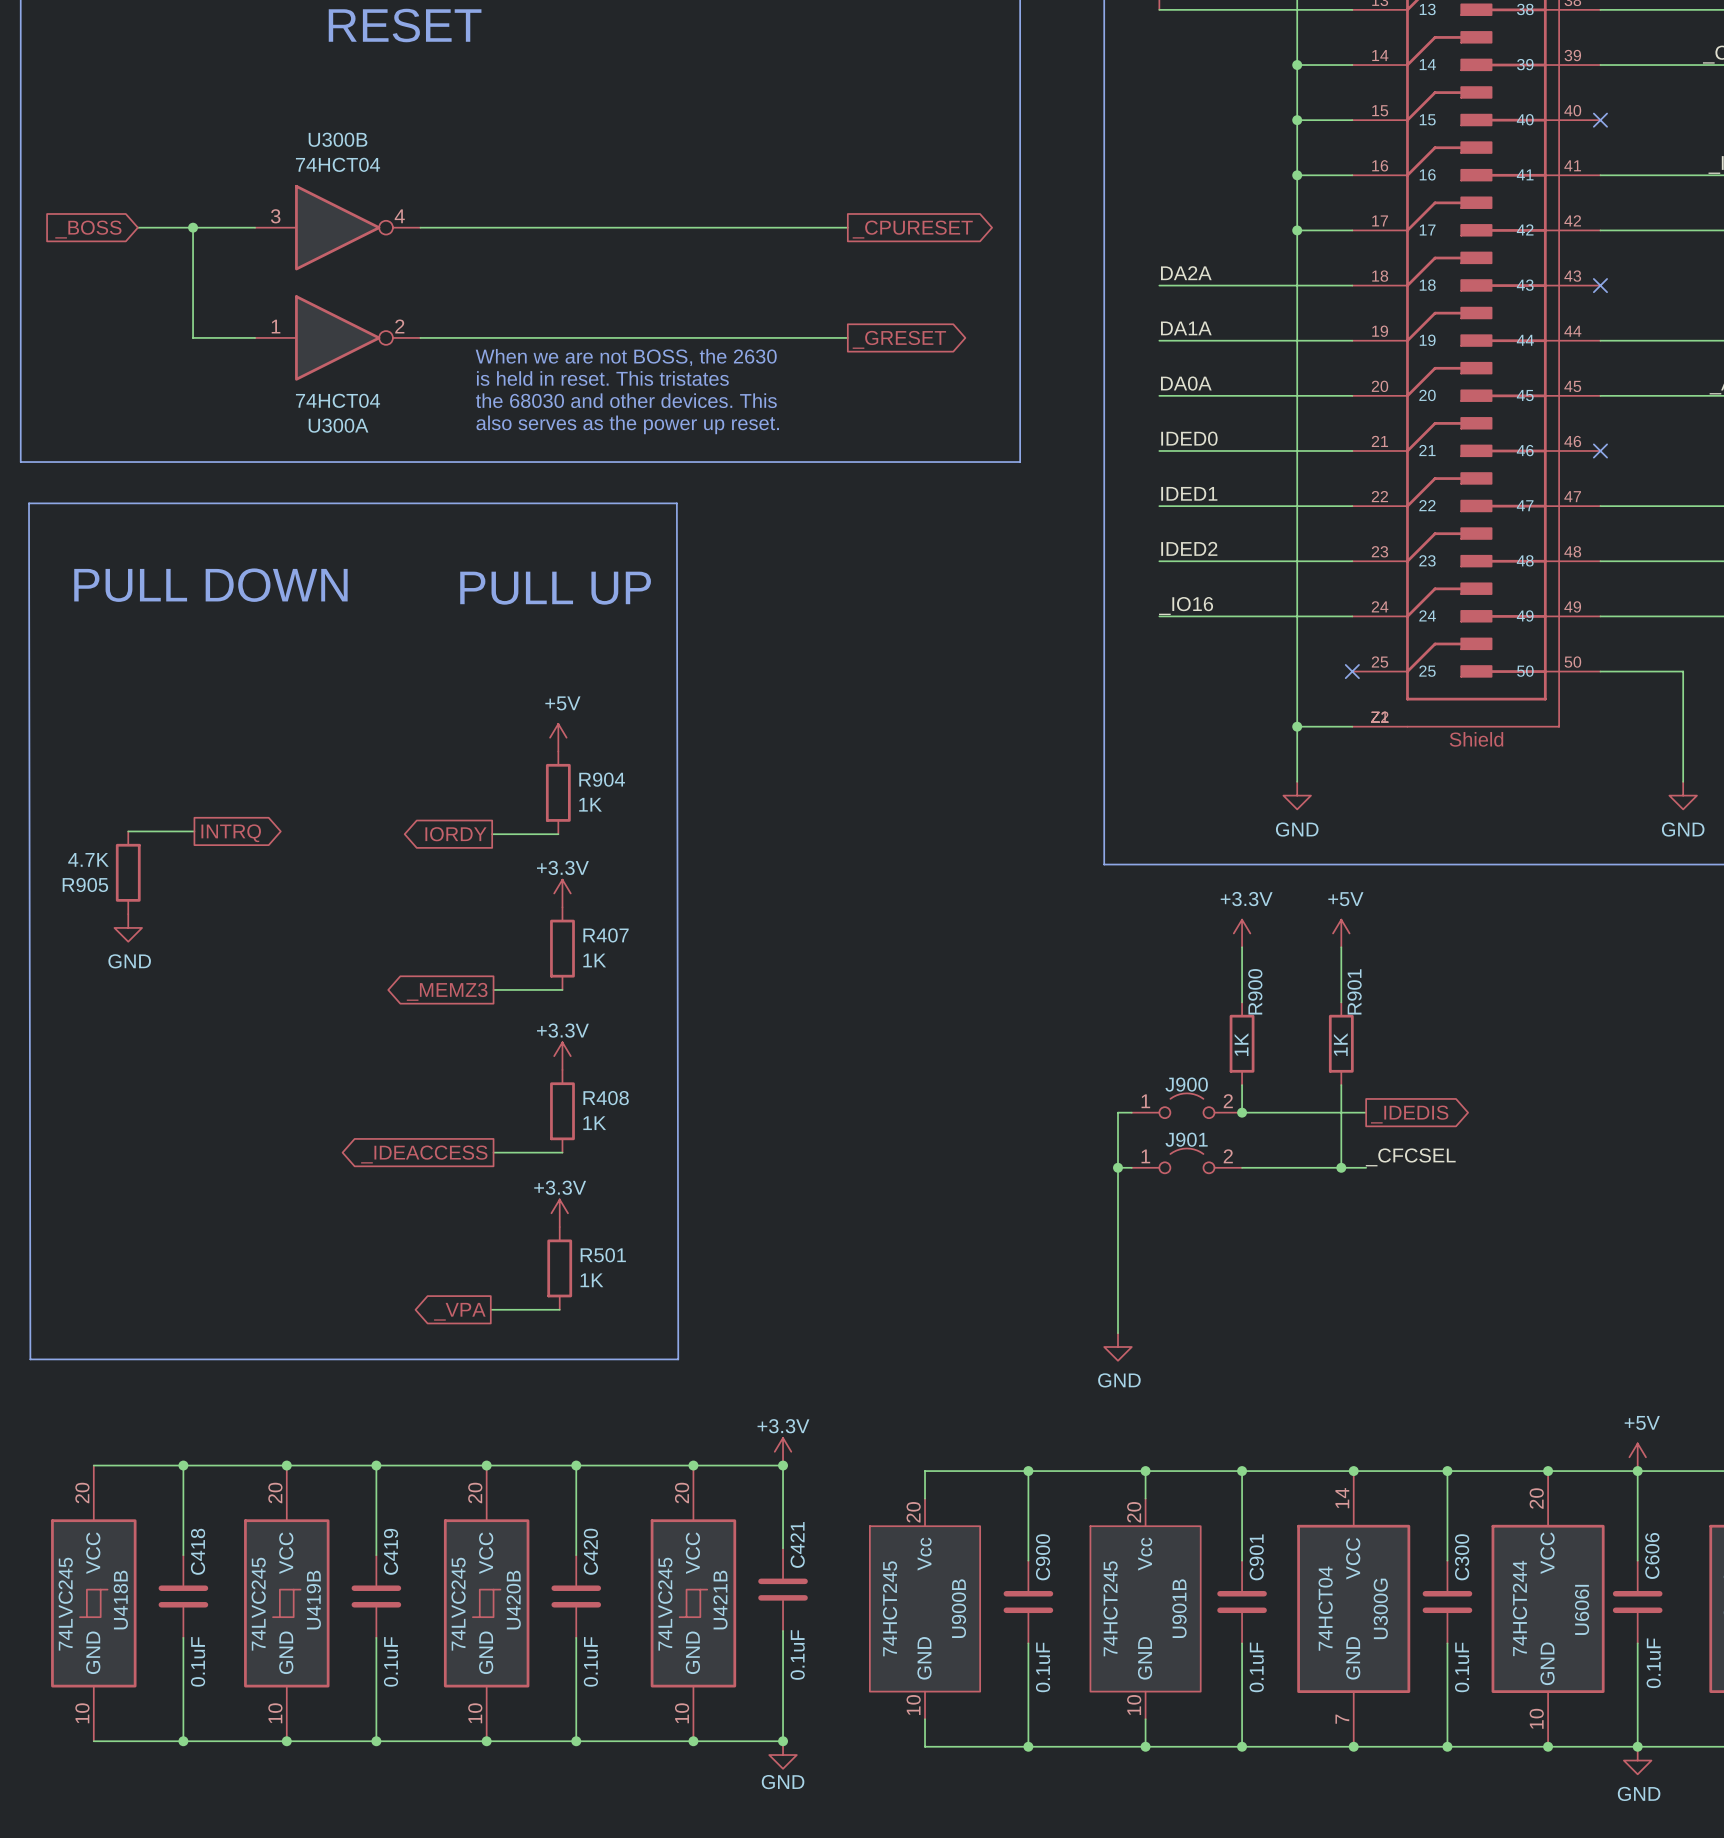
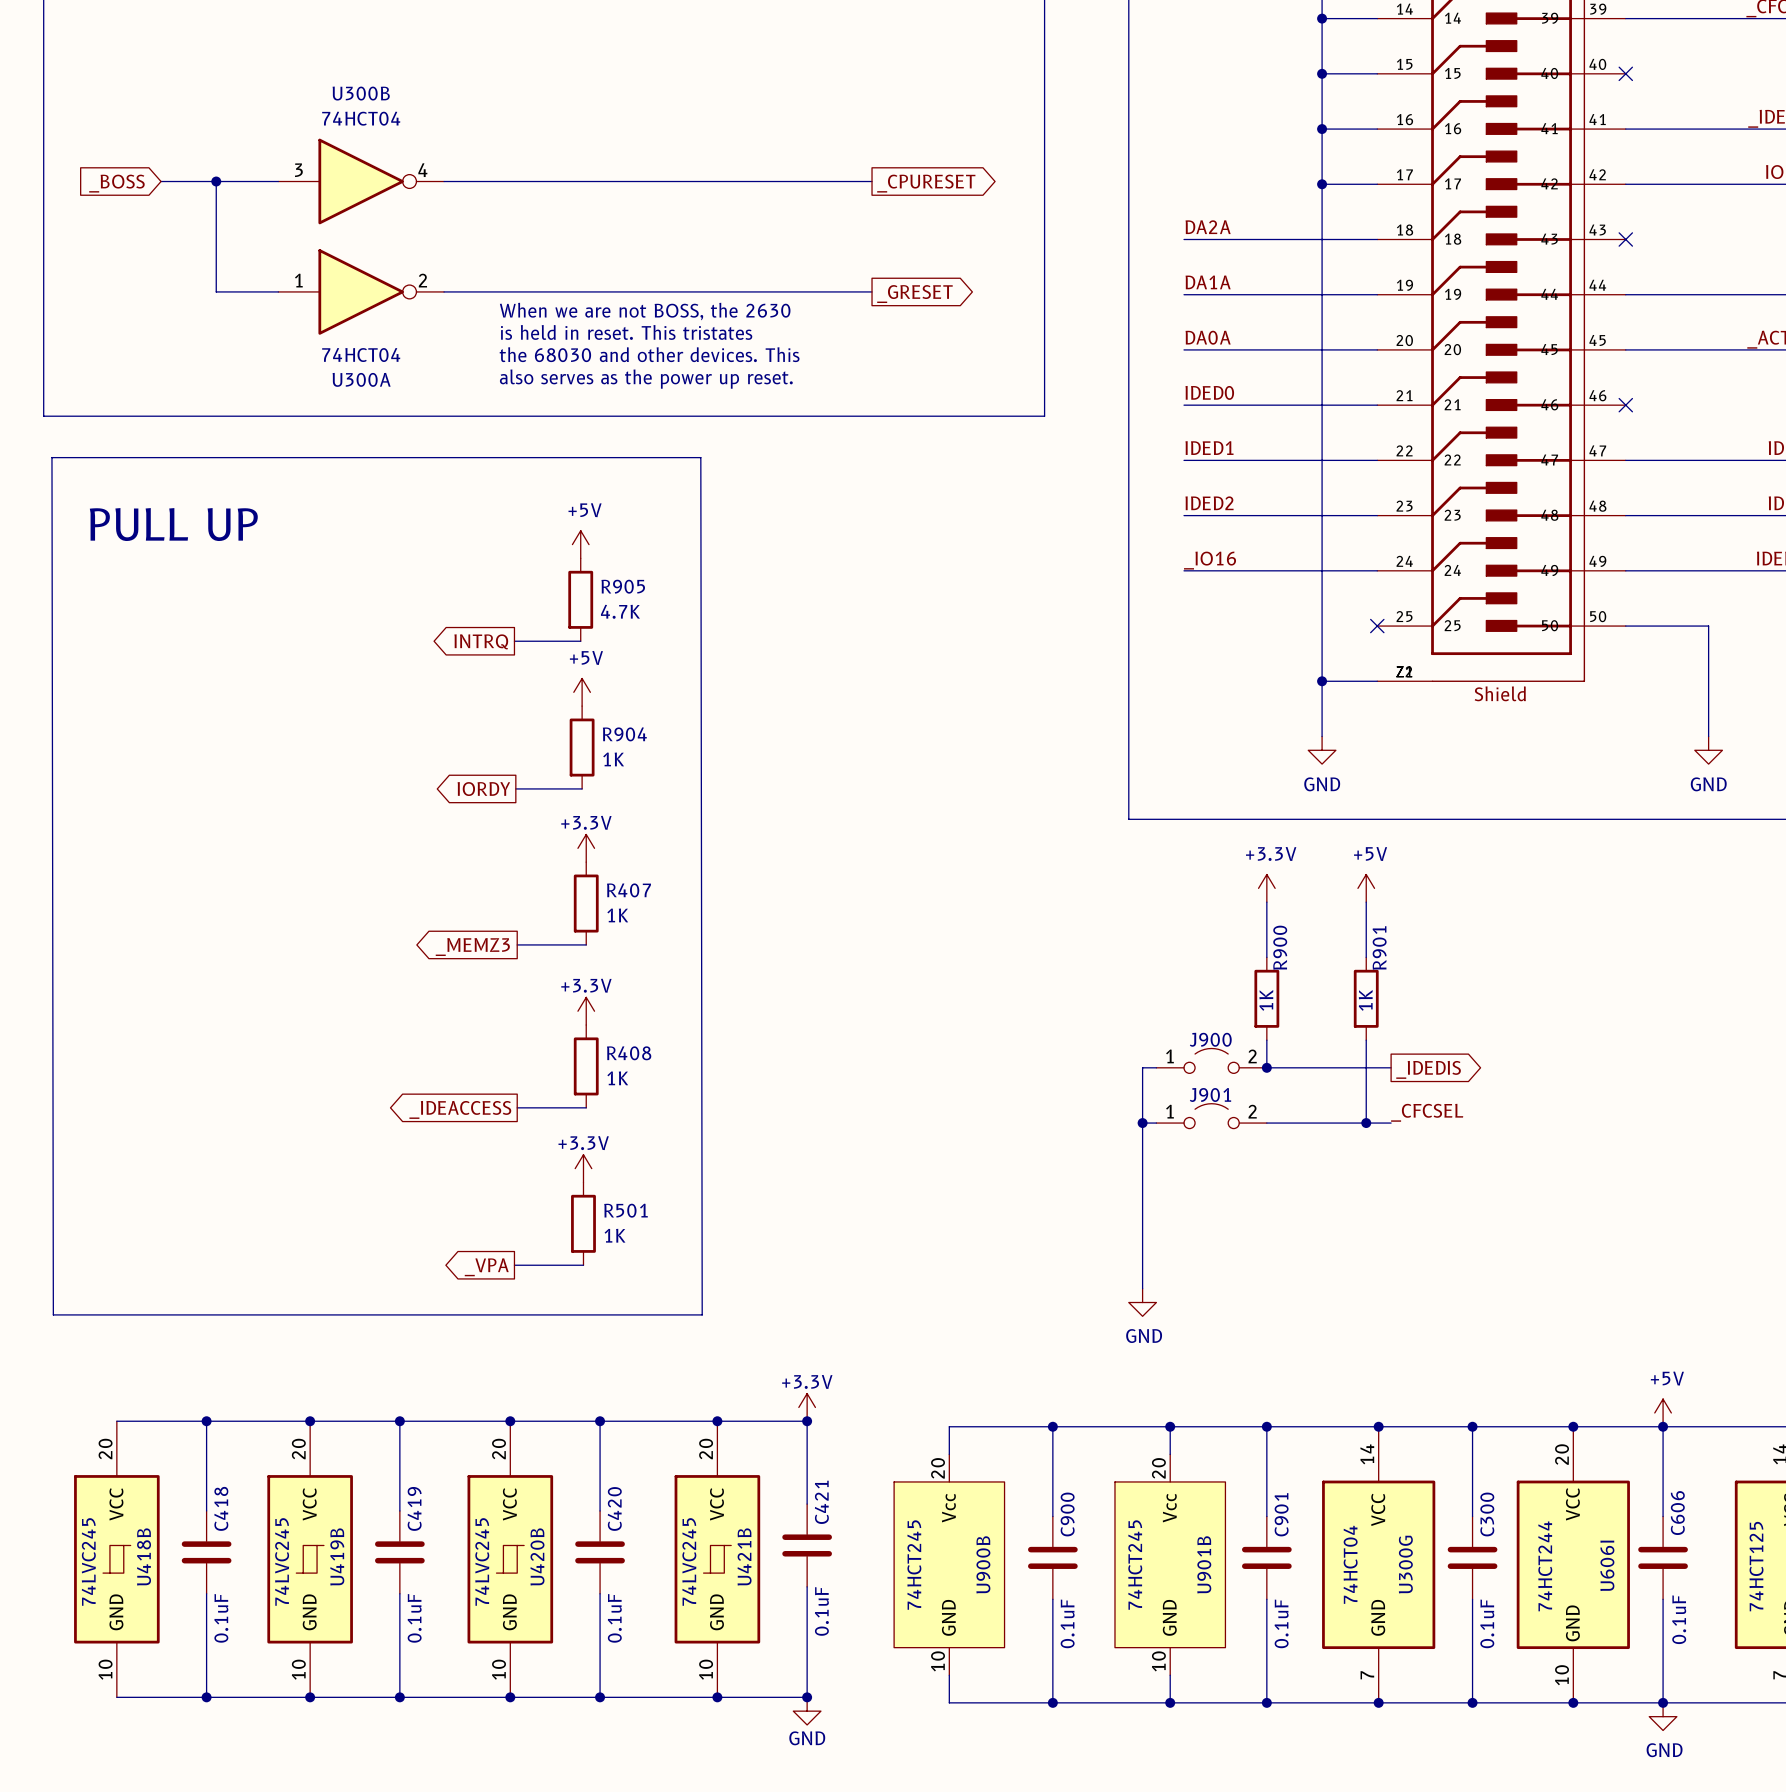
text: PULL DOWN (210, 585) -> PULL UP (173, 524)
text: PULL UP (555, 588) -> none
power symbol: none -> +5V (580, 544)
wire: none -> (514, 641) (580, 641)
global label: none -> INTRQ (481, 641)
wire: (128, 831) (194, 831) -> none
global label: INTRQ (231, 833) -> none
R905 value position: 4.7K (88, 859) -> 4.7K (620, 611)
R905 position: (128, 872) -> (580, 599)
R905 name position: R905 (85, 884) -> R905 (623, 586)
power symbol: GND (128, 927) -> none

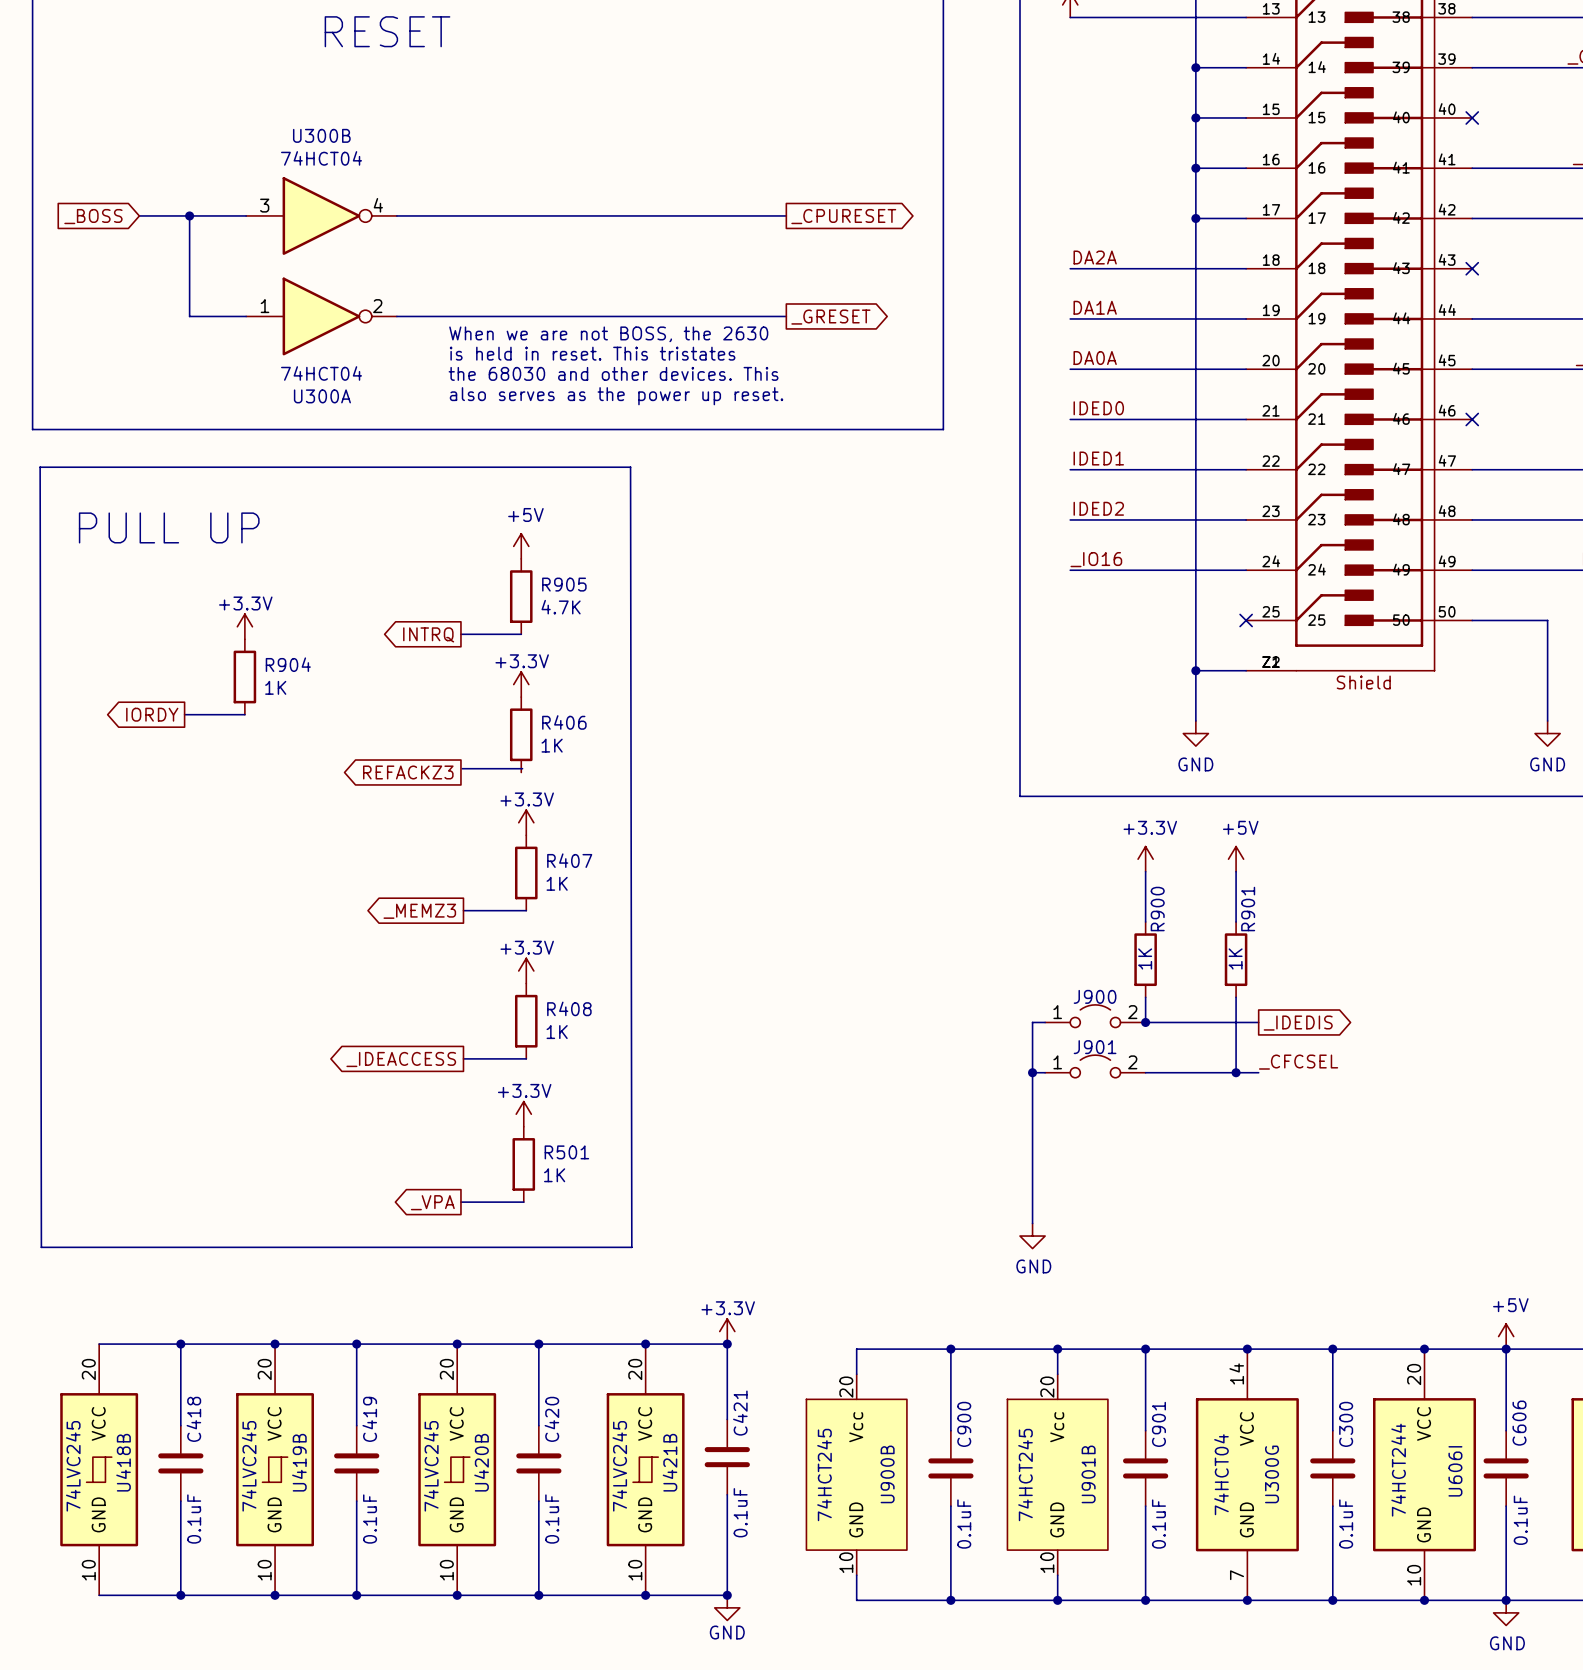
power symbol: none -> +3.3V (244, 626)
power symbol: +5V (582, 692) -> +3.3V (521, 684)
global label: none -> IORDY (152, 714)
wire: none -> (184, 714) (244, 714)
R904 position: (582, 747) -> (244, 677)
R406: none -> 1K (521, 734)
global label: IORDY (483, 789) -> REFACKZ3 (408, 772)

